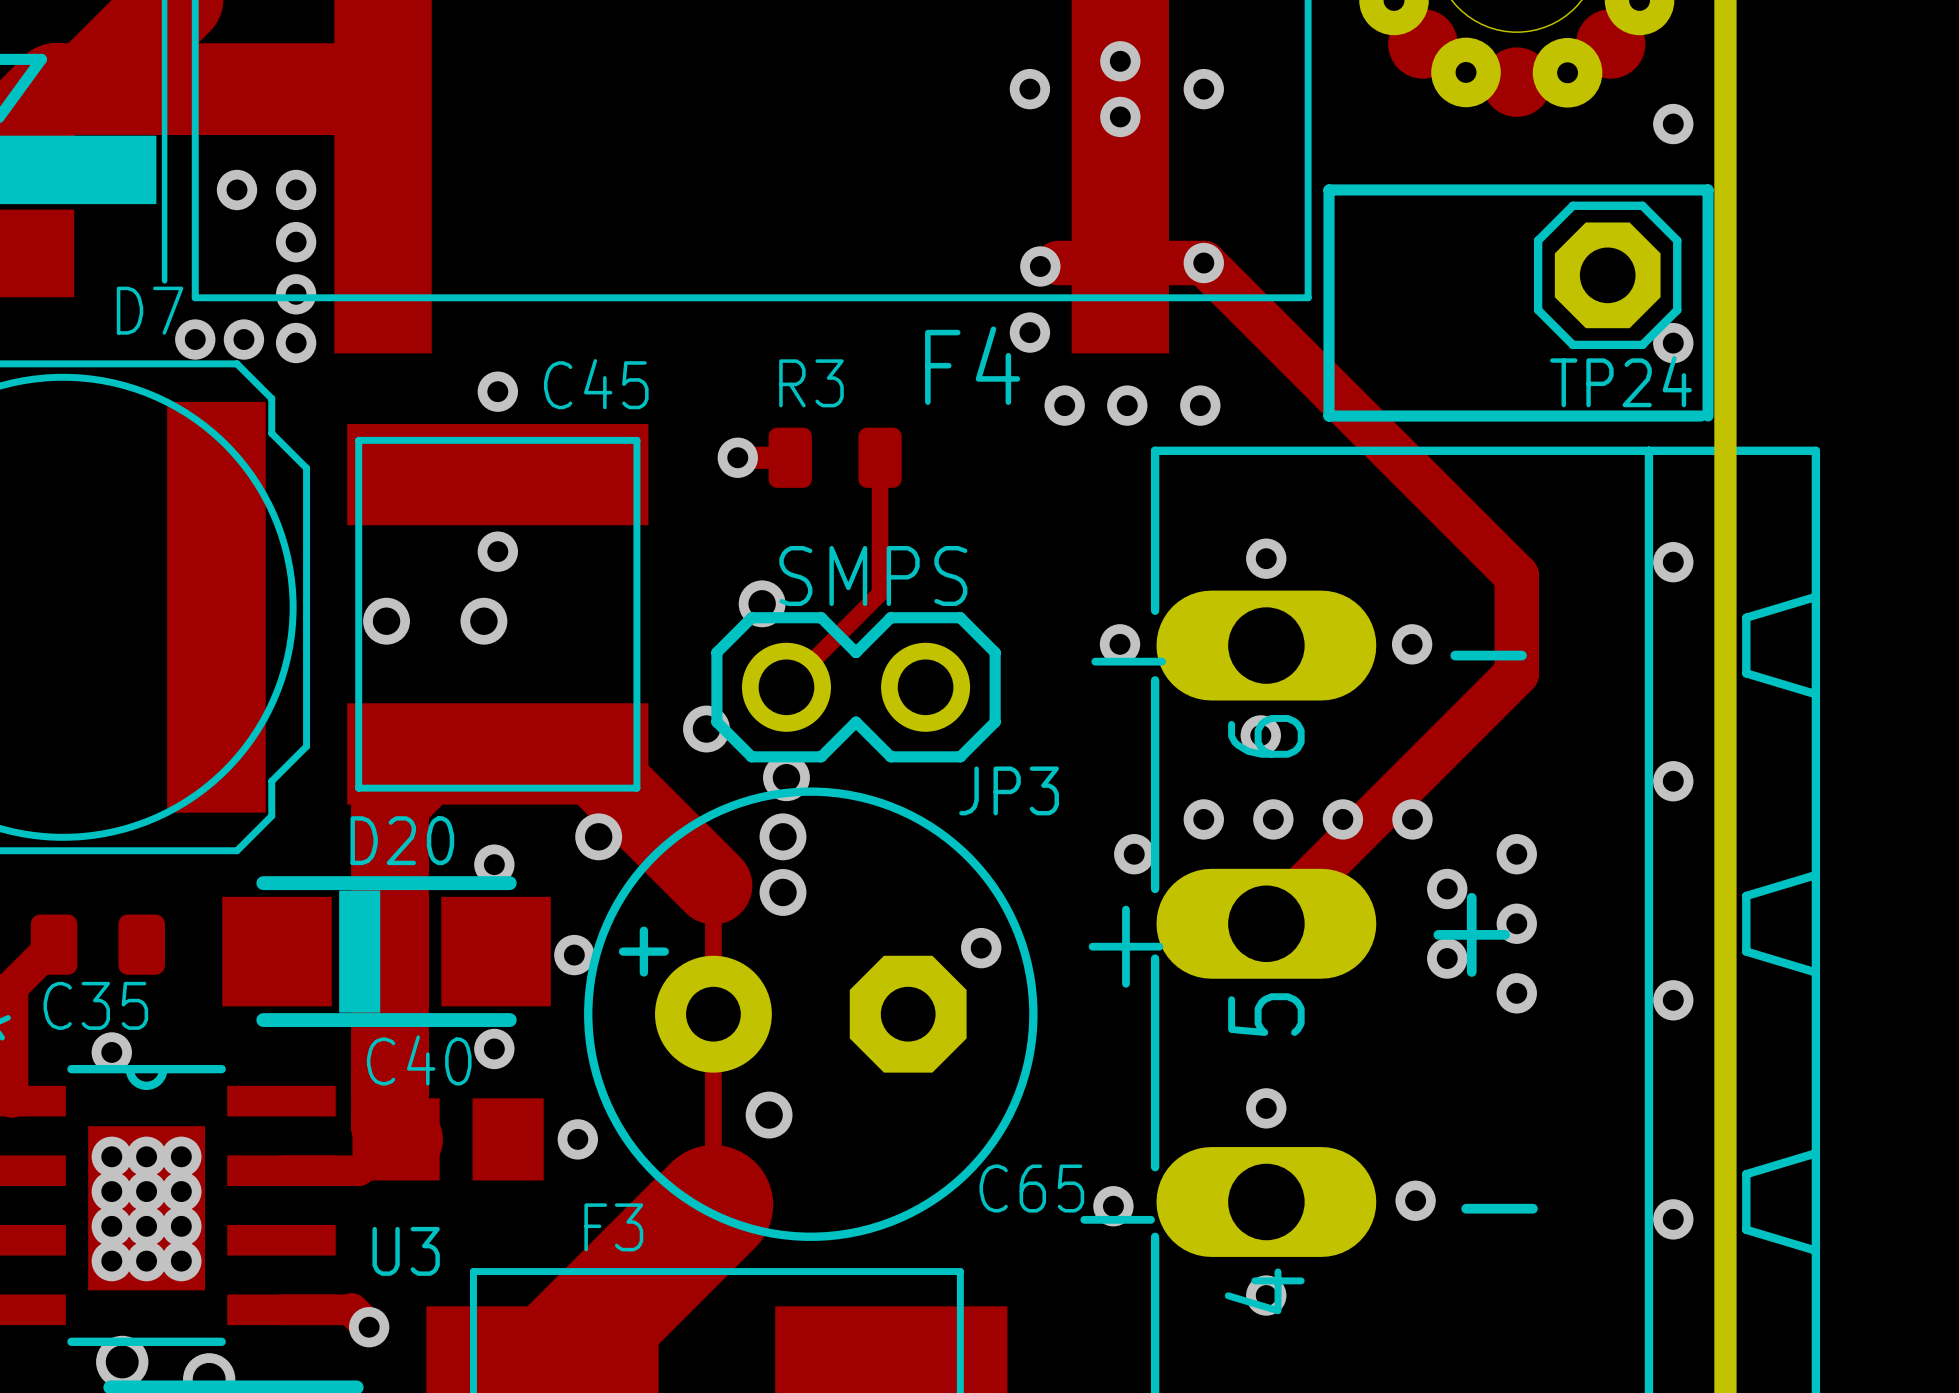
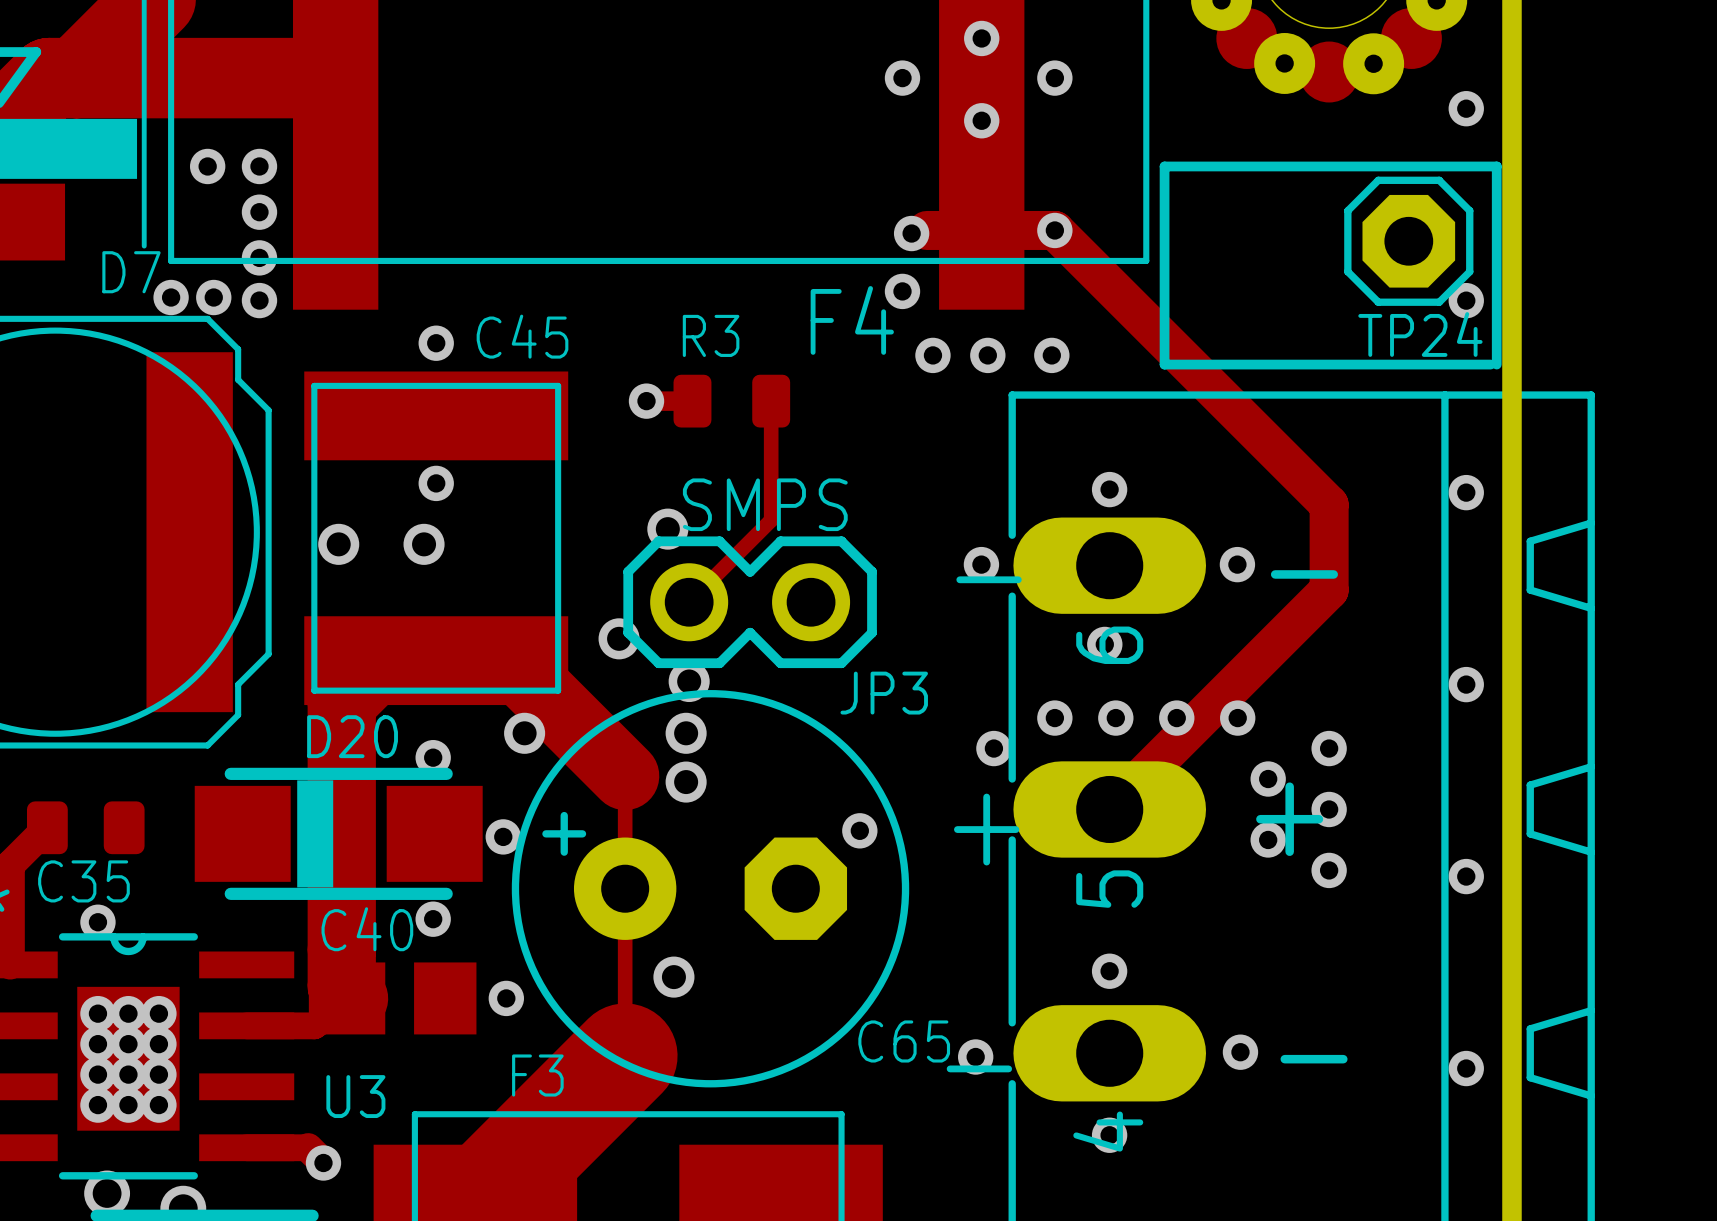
via position: (1120, 61) -> (981, 38)
via position: (1120, 116) -> (981, 120)

